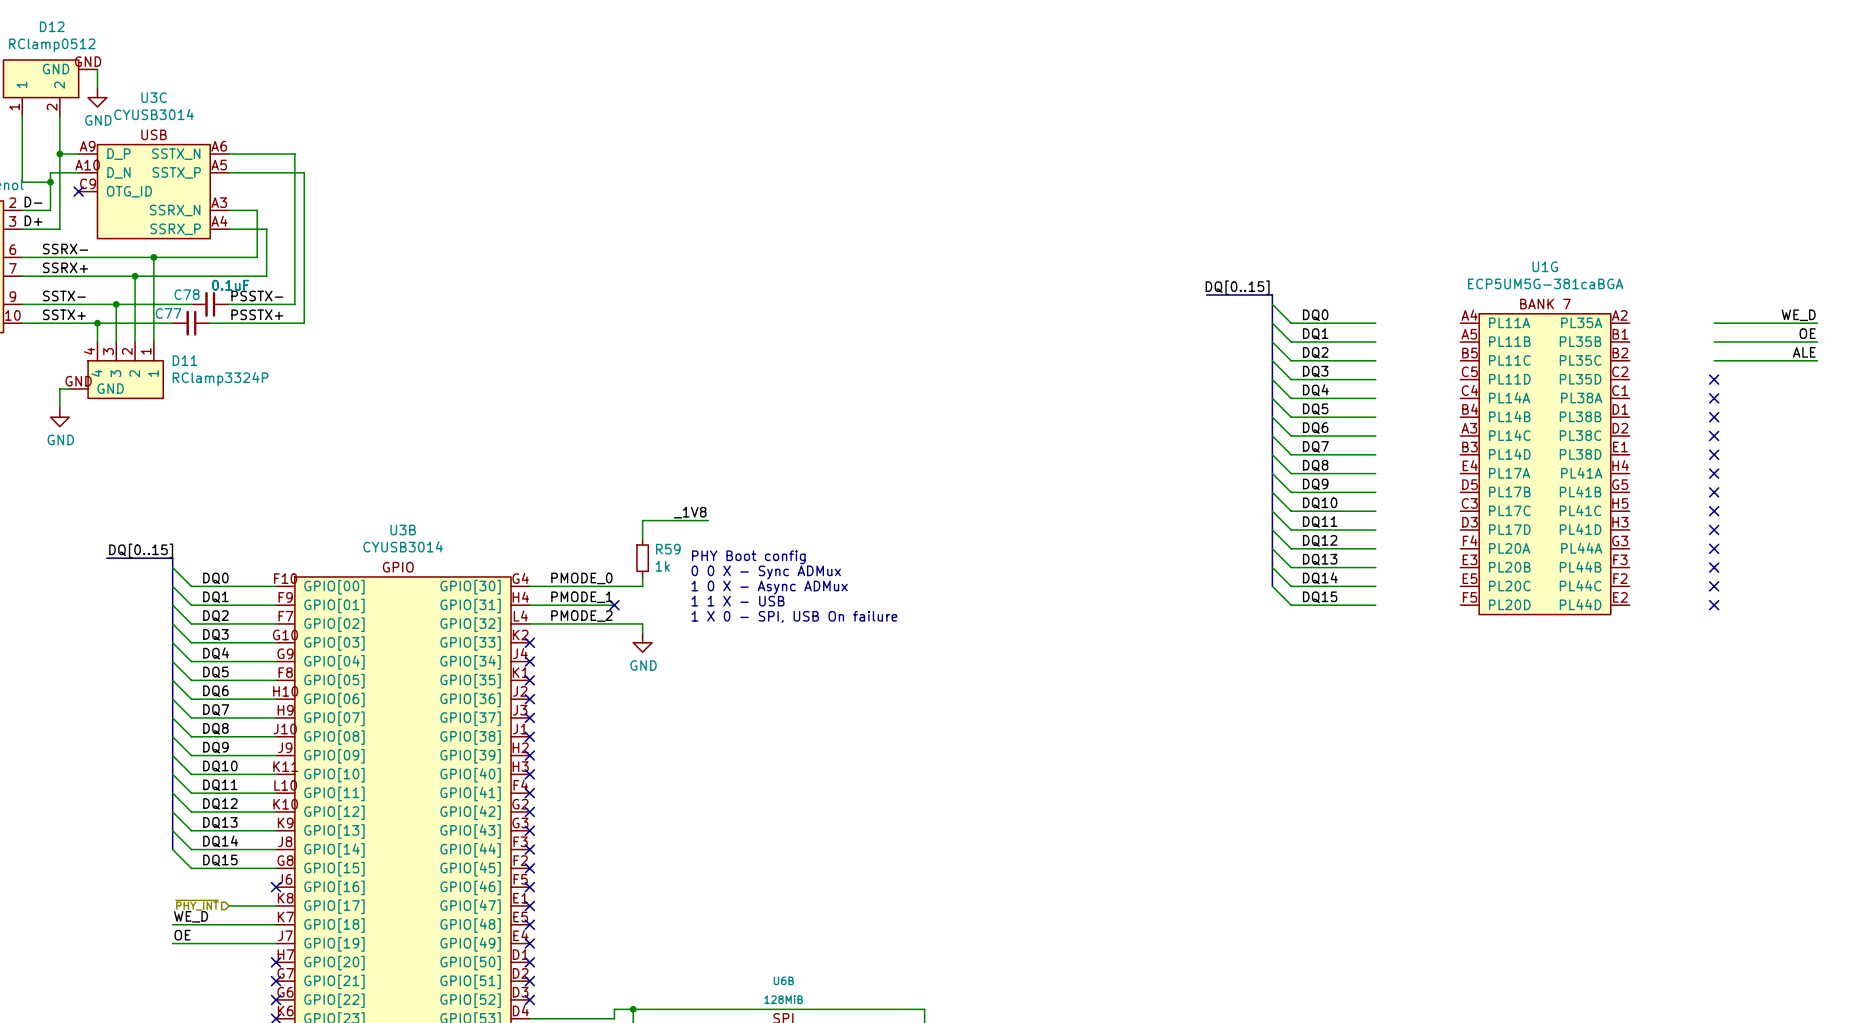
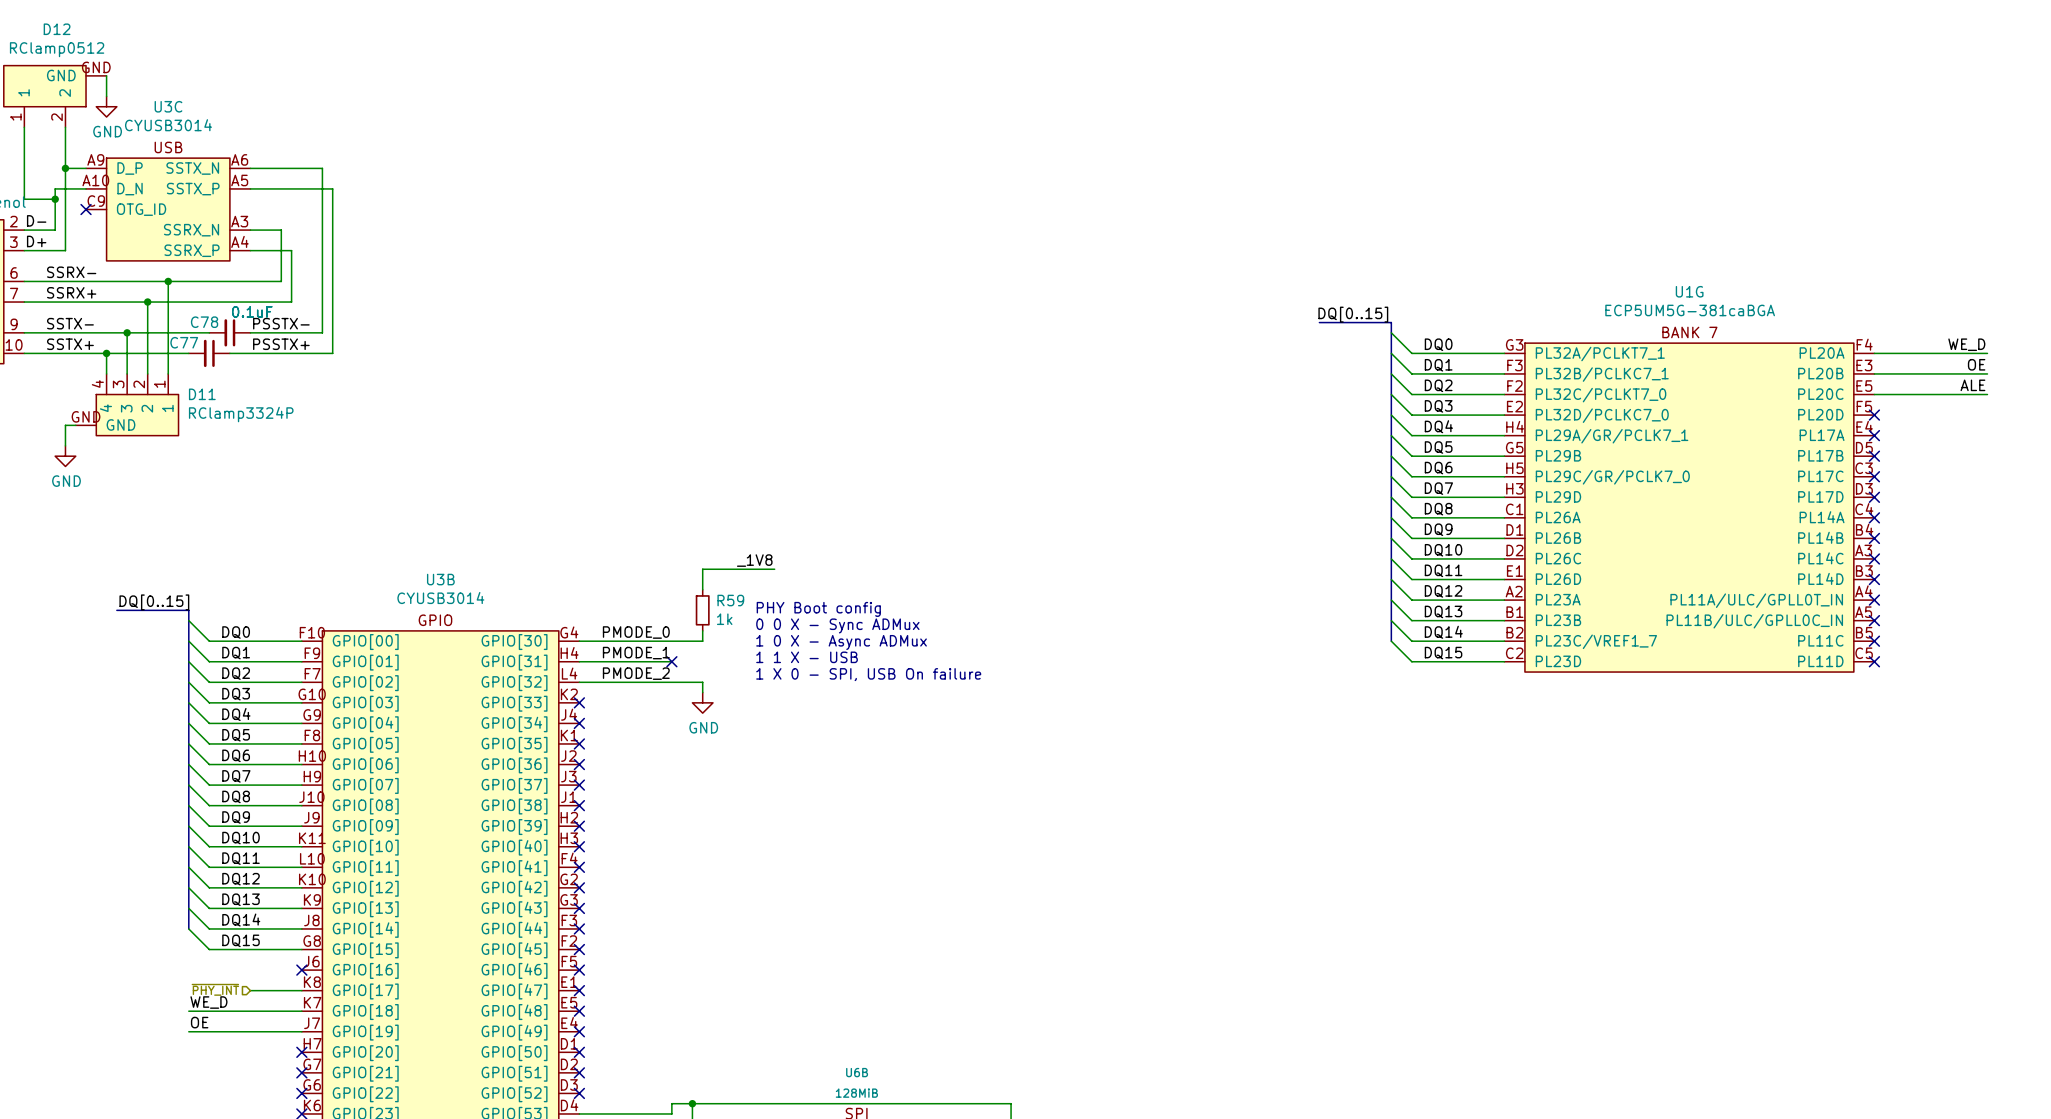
U1G symbol: [1460, 313, 1630, 615] -> [1504, 343, 1875, 673]

